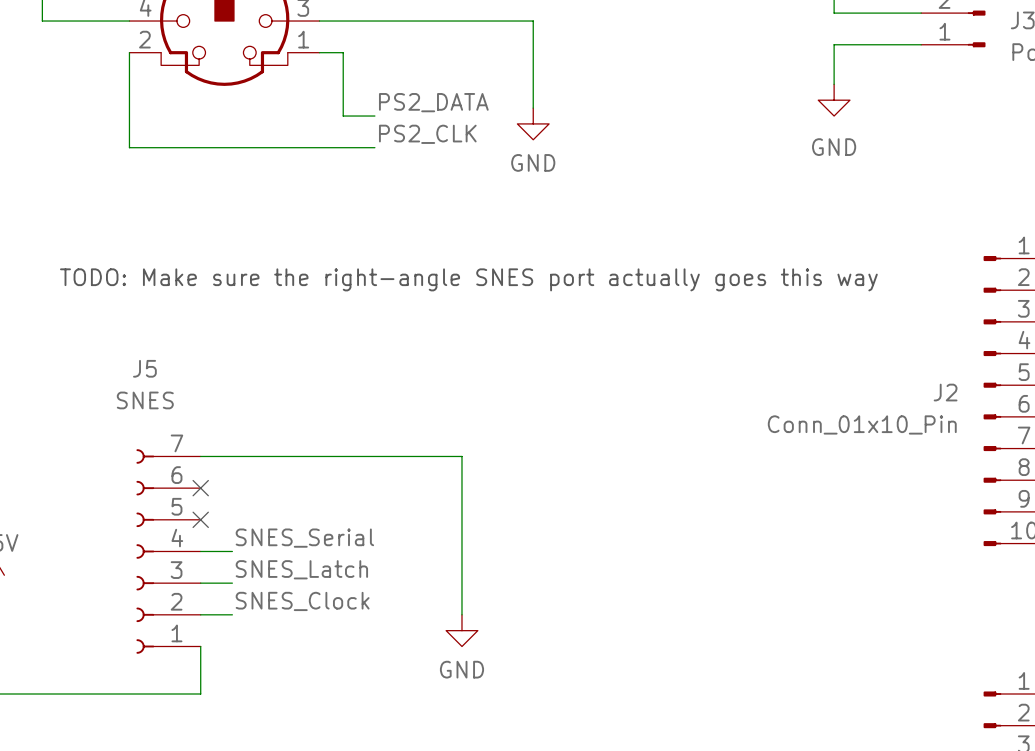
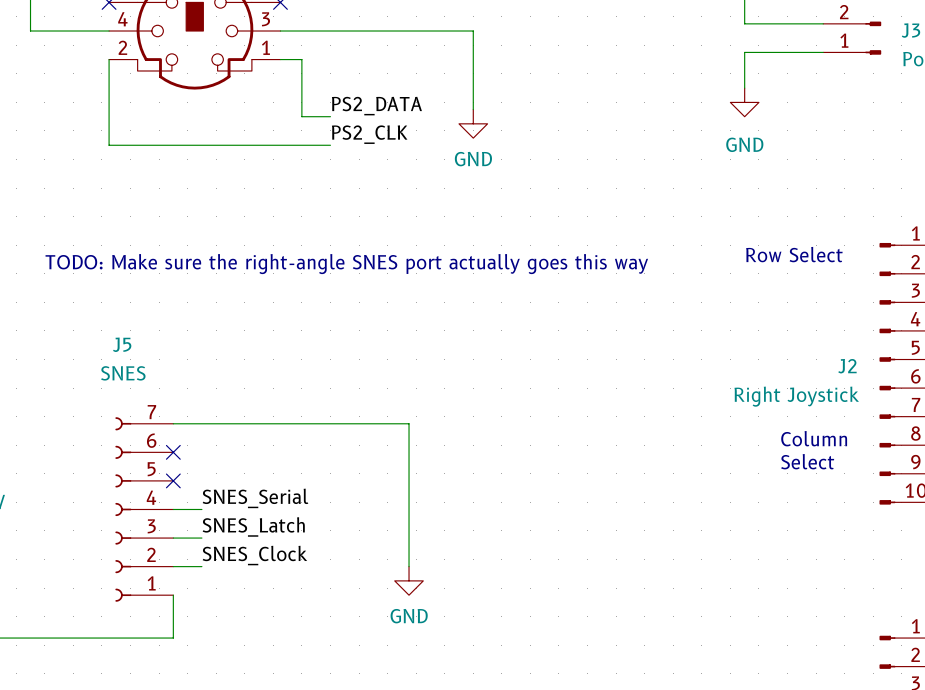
text: none -> Row Select (794, 254)
J2 value: Conn_01x10_Pin (862, 424) -> Right Joystick (796, 396)
text: none -> Column (814, 438)
text: none -> Select (807, 461)

